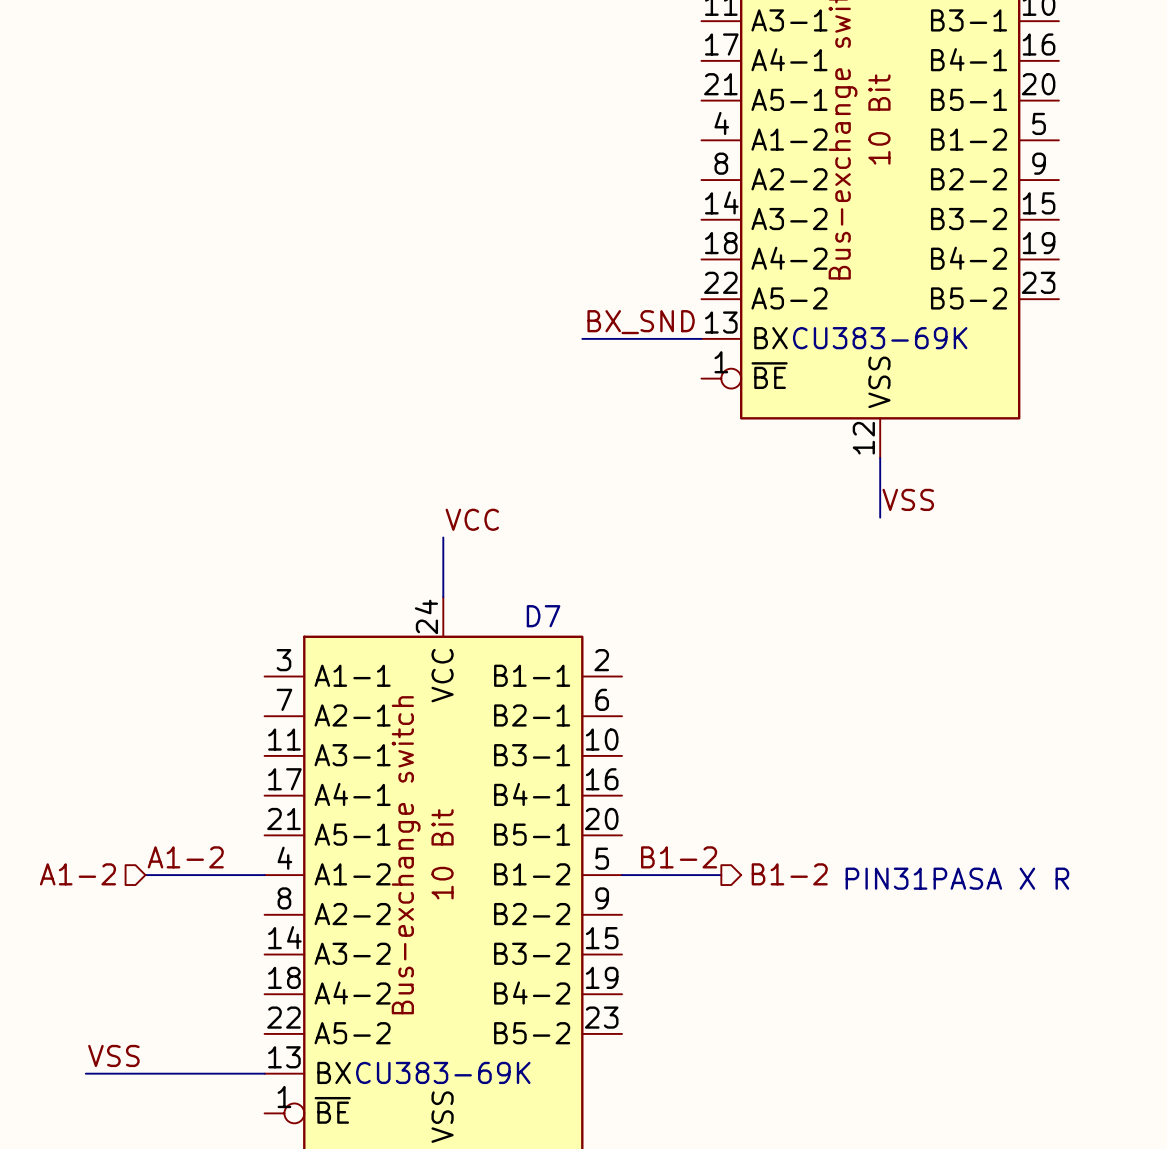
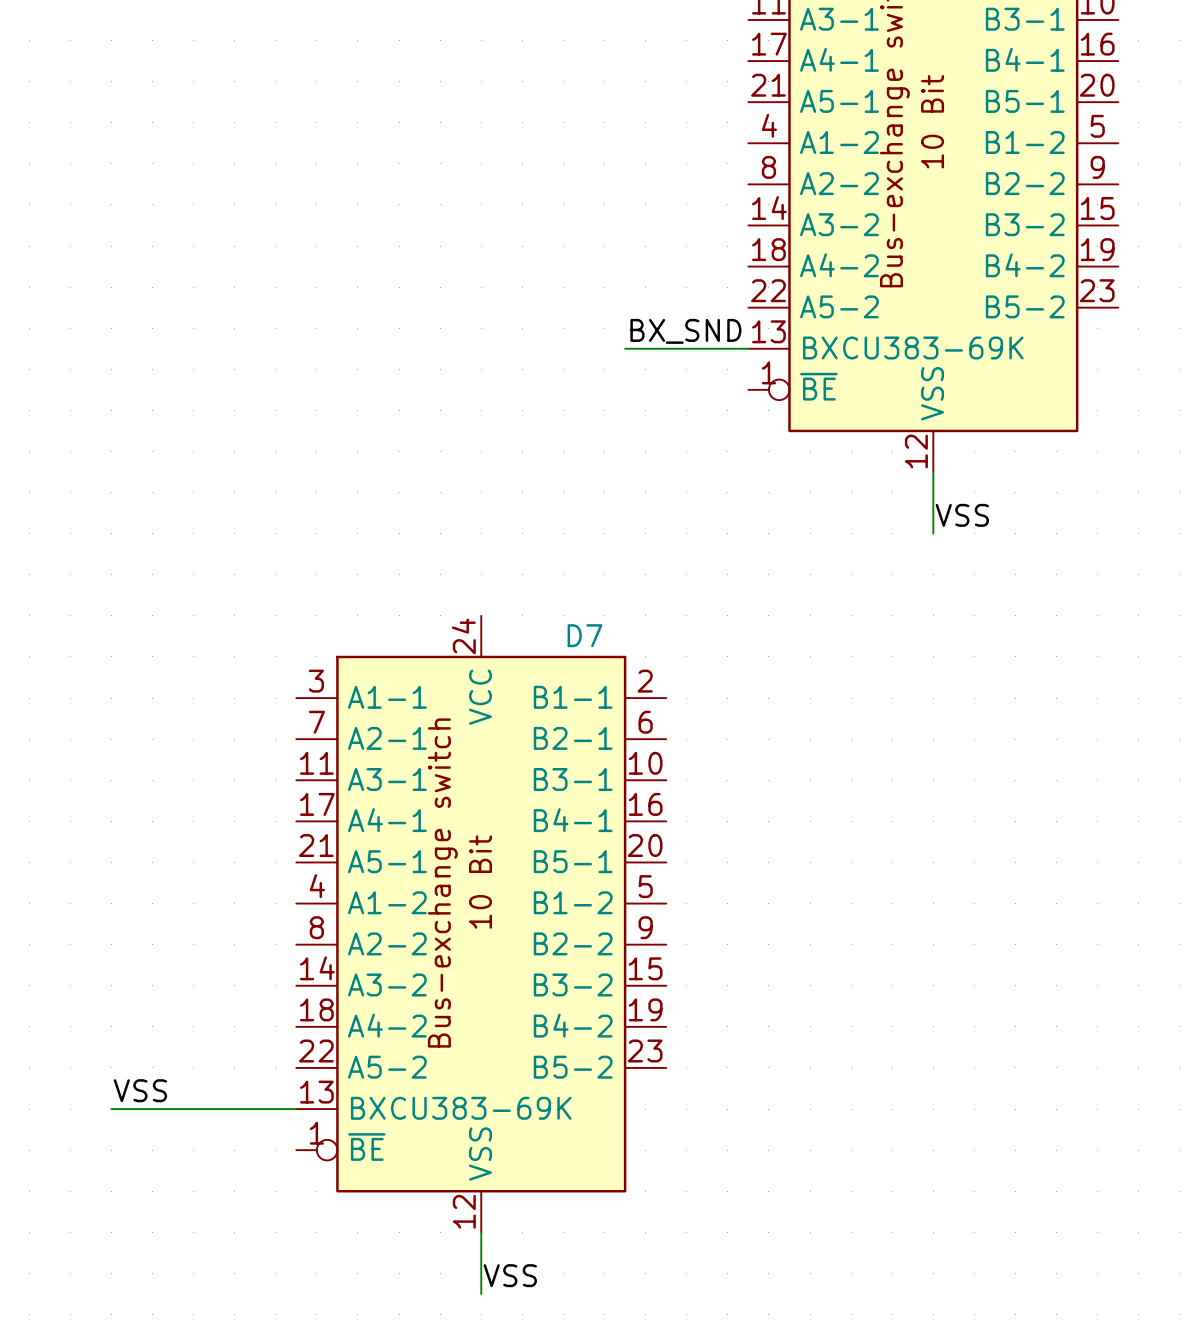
label: VCC (472, 519) -> none
wire: (443, 537) (443, 597) -> none
label: A1-2 (185, 857) -> none
label: B1-2 (679, 857) -> none
hierarchical label: A1-2 (77, 874) -> none
hierarchical label: B1-2 (789, 874) -> none
wire: (145, 875) (264, 875) -> none
wire: (622, 875) (721, 875) -> none
text: PIN31PASA X R (957, 878) -> none

